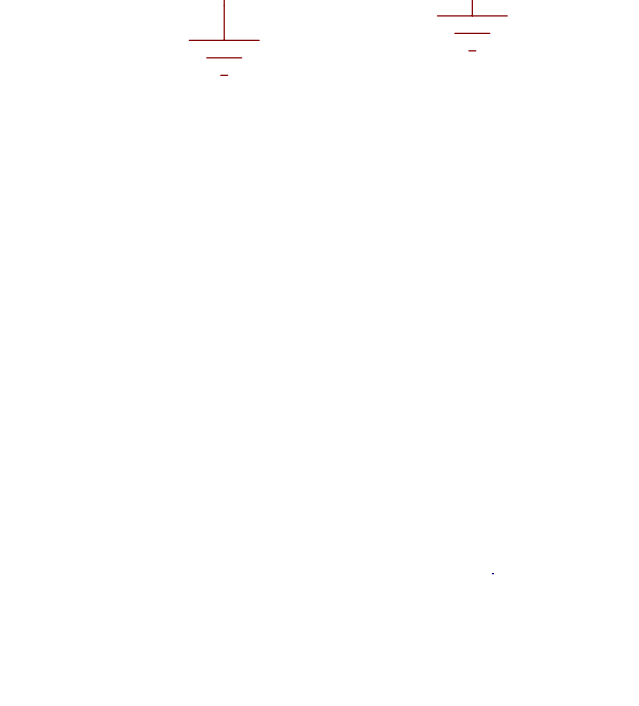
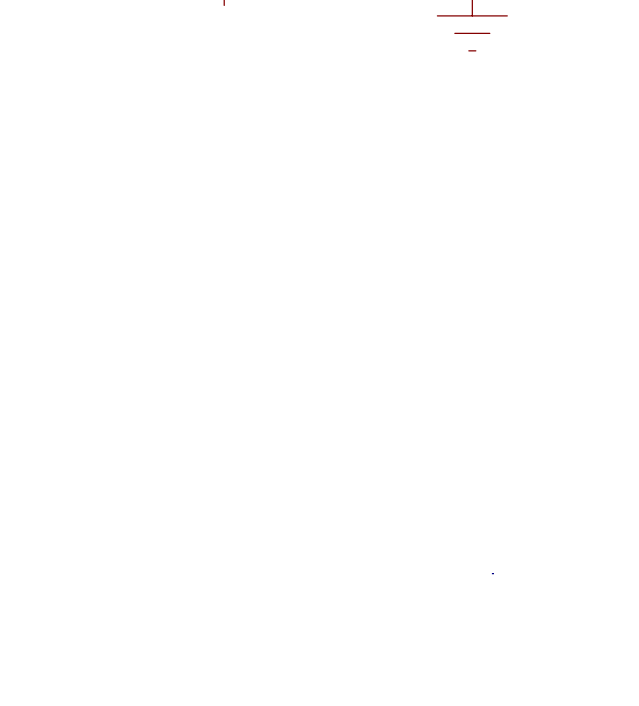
power symbol: (224, 40) -> none

